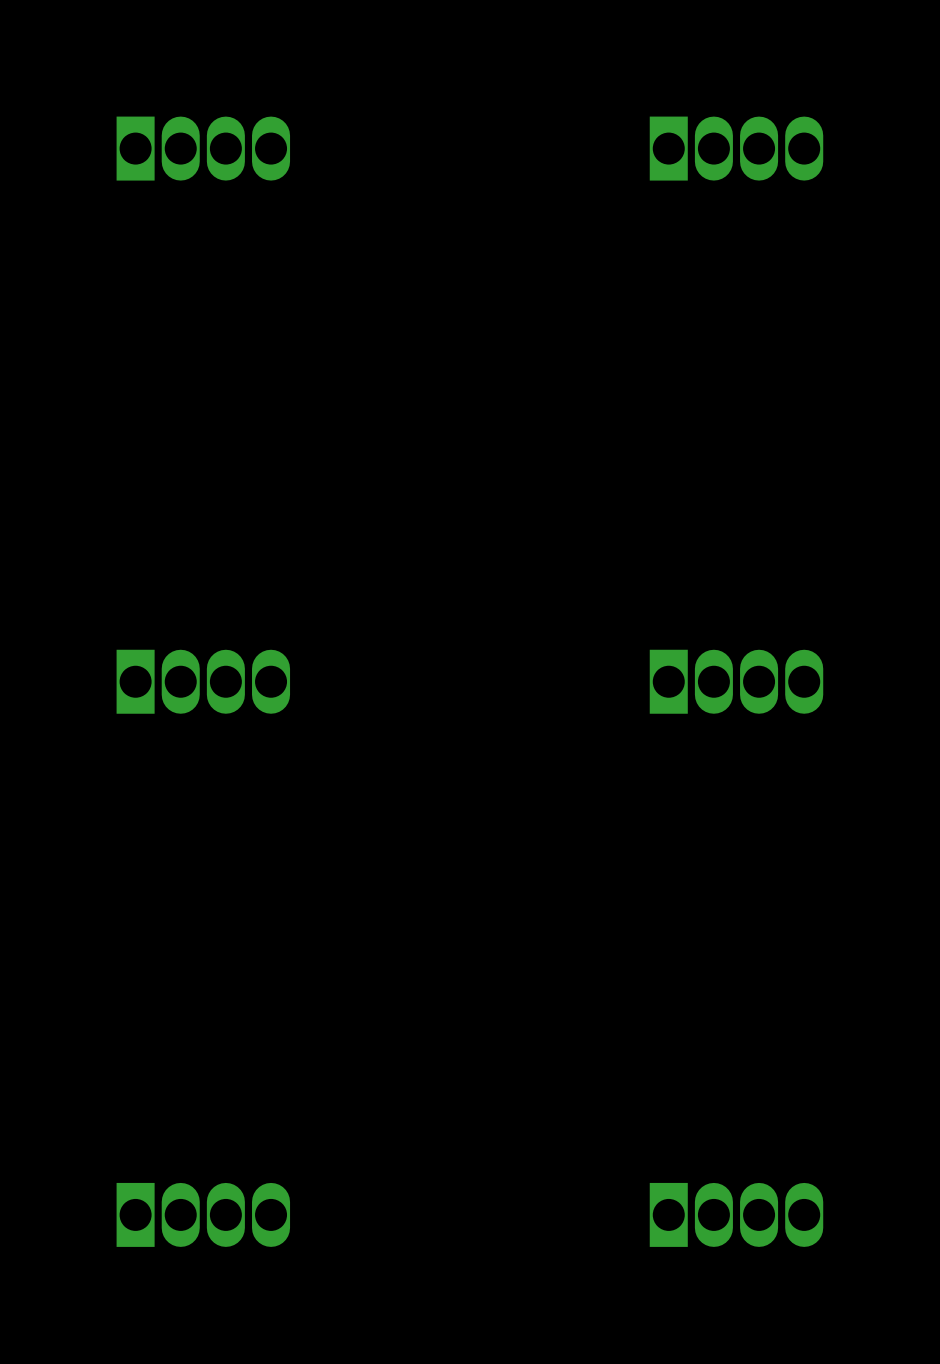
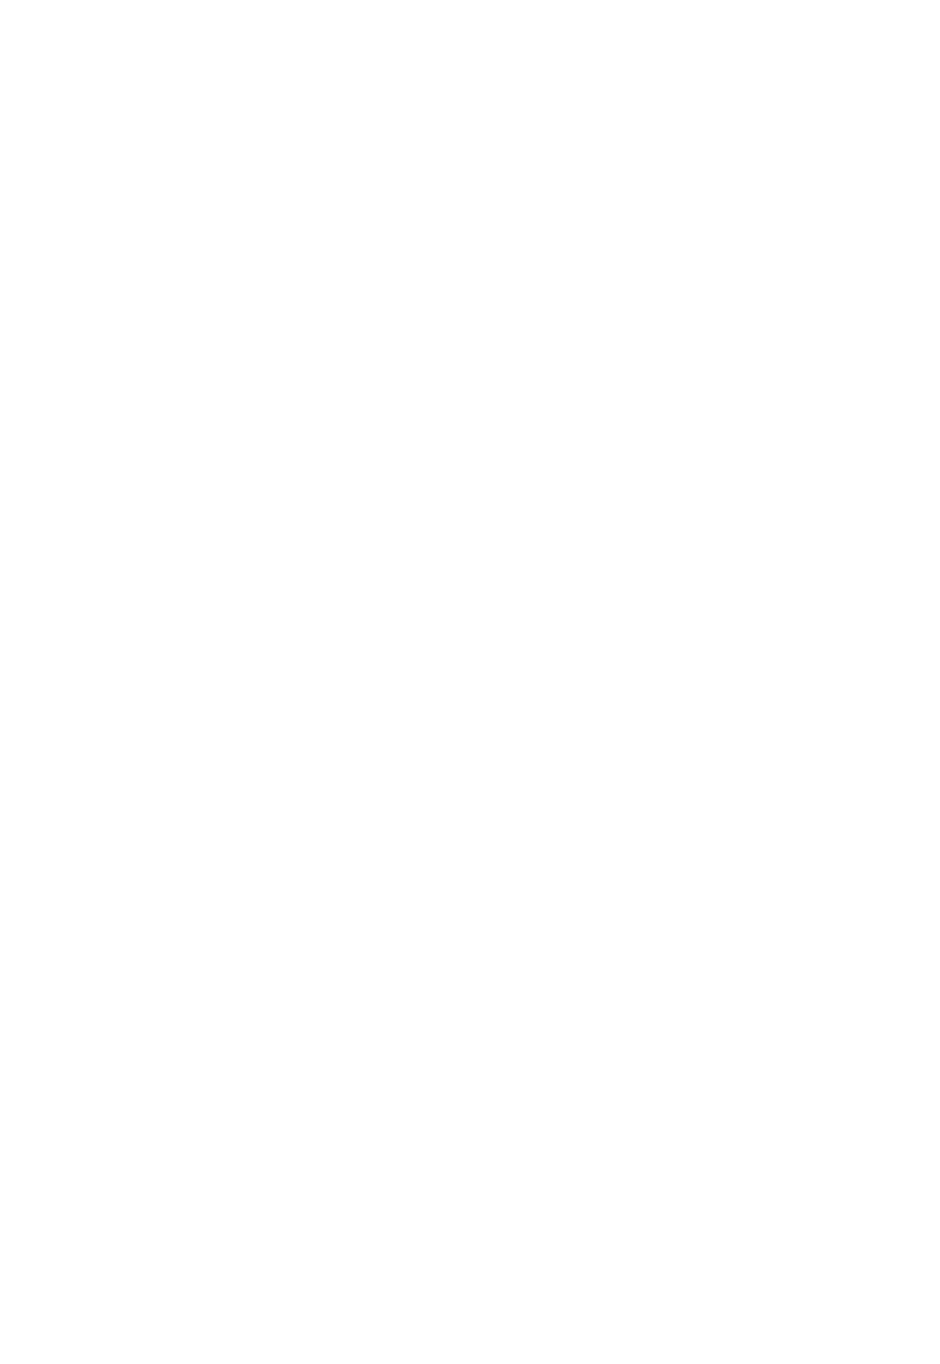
part: (203, 148) -> none
part: (736, 148) -> none
part: (203, 681) -> none
part: (736, 681) -> none
part: (203, 1214) -> none
part: (736, 1214) -> none

